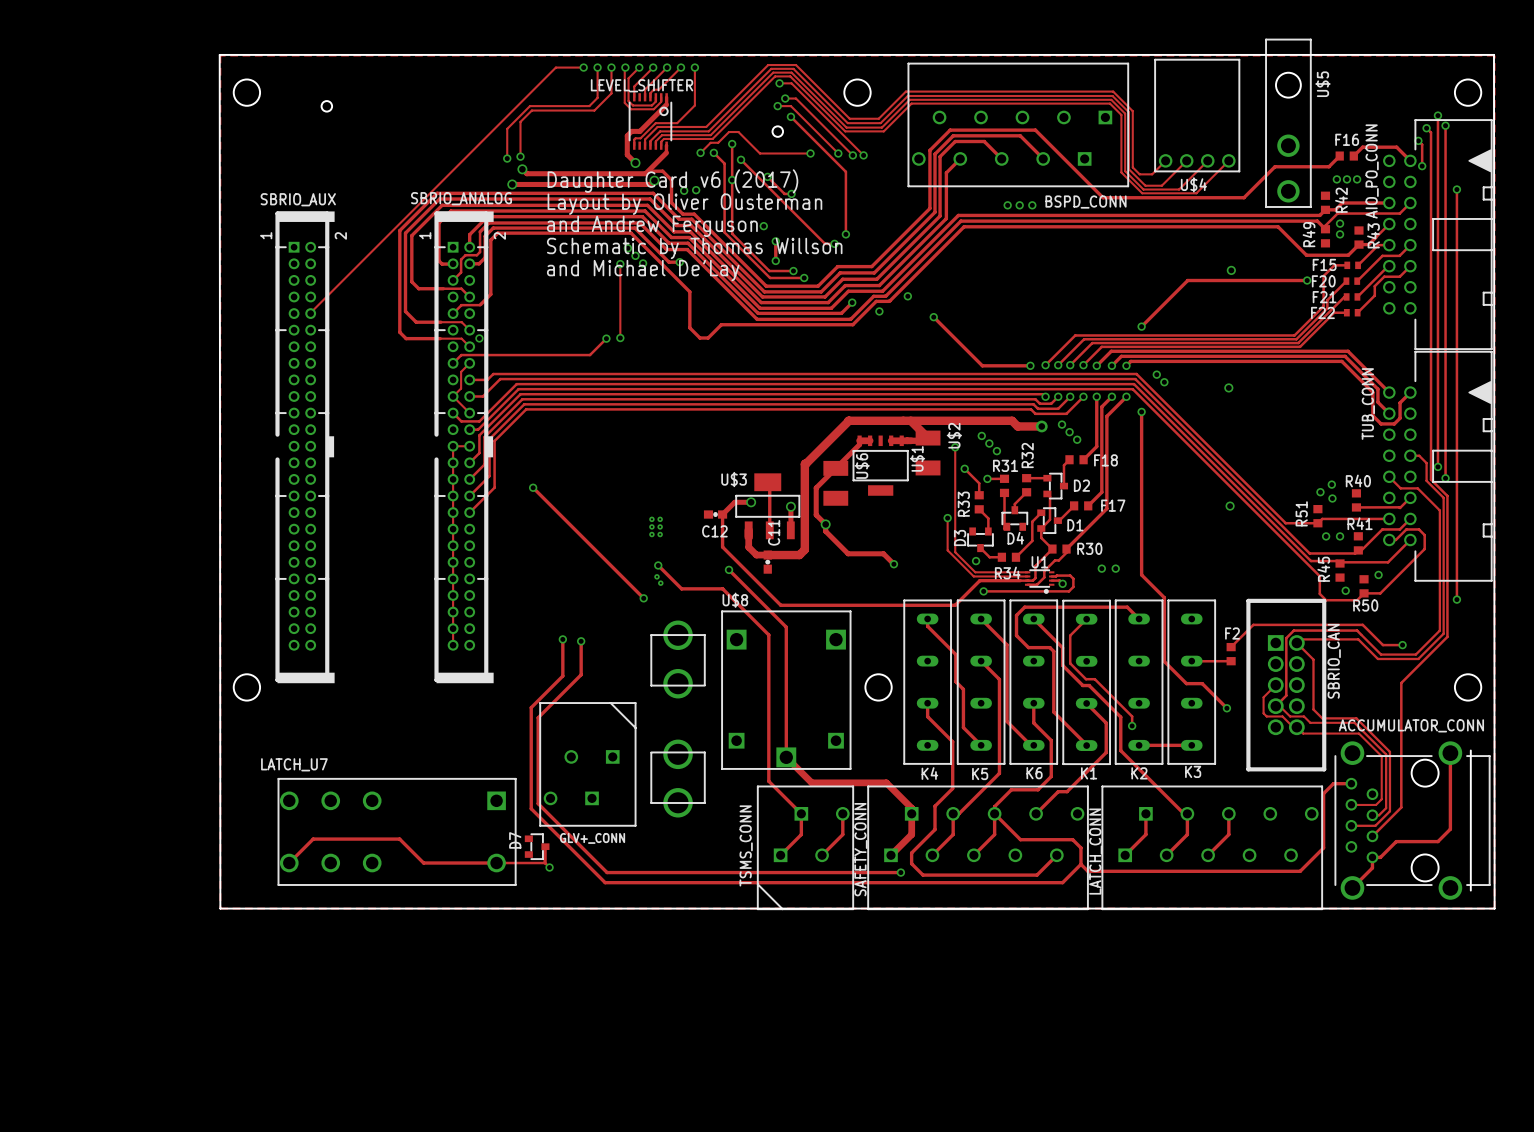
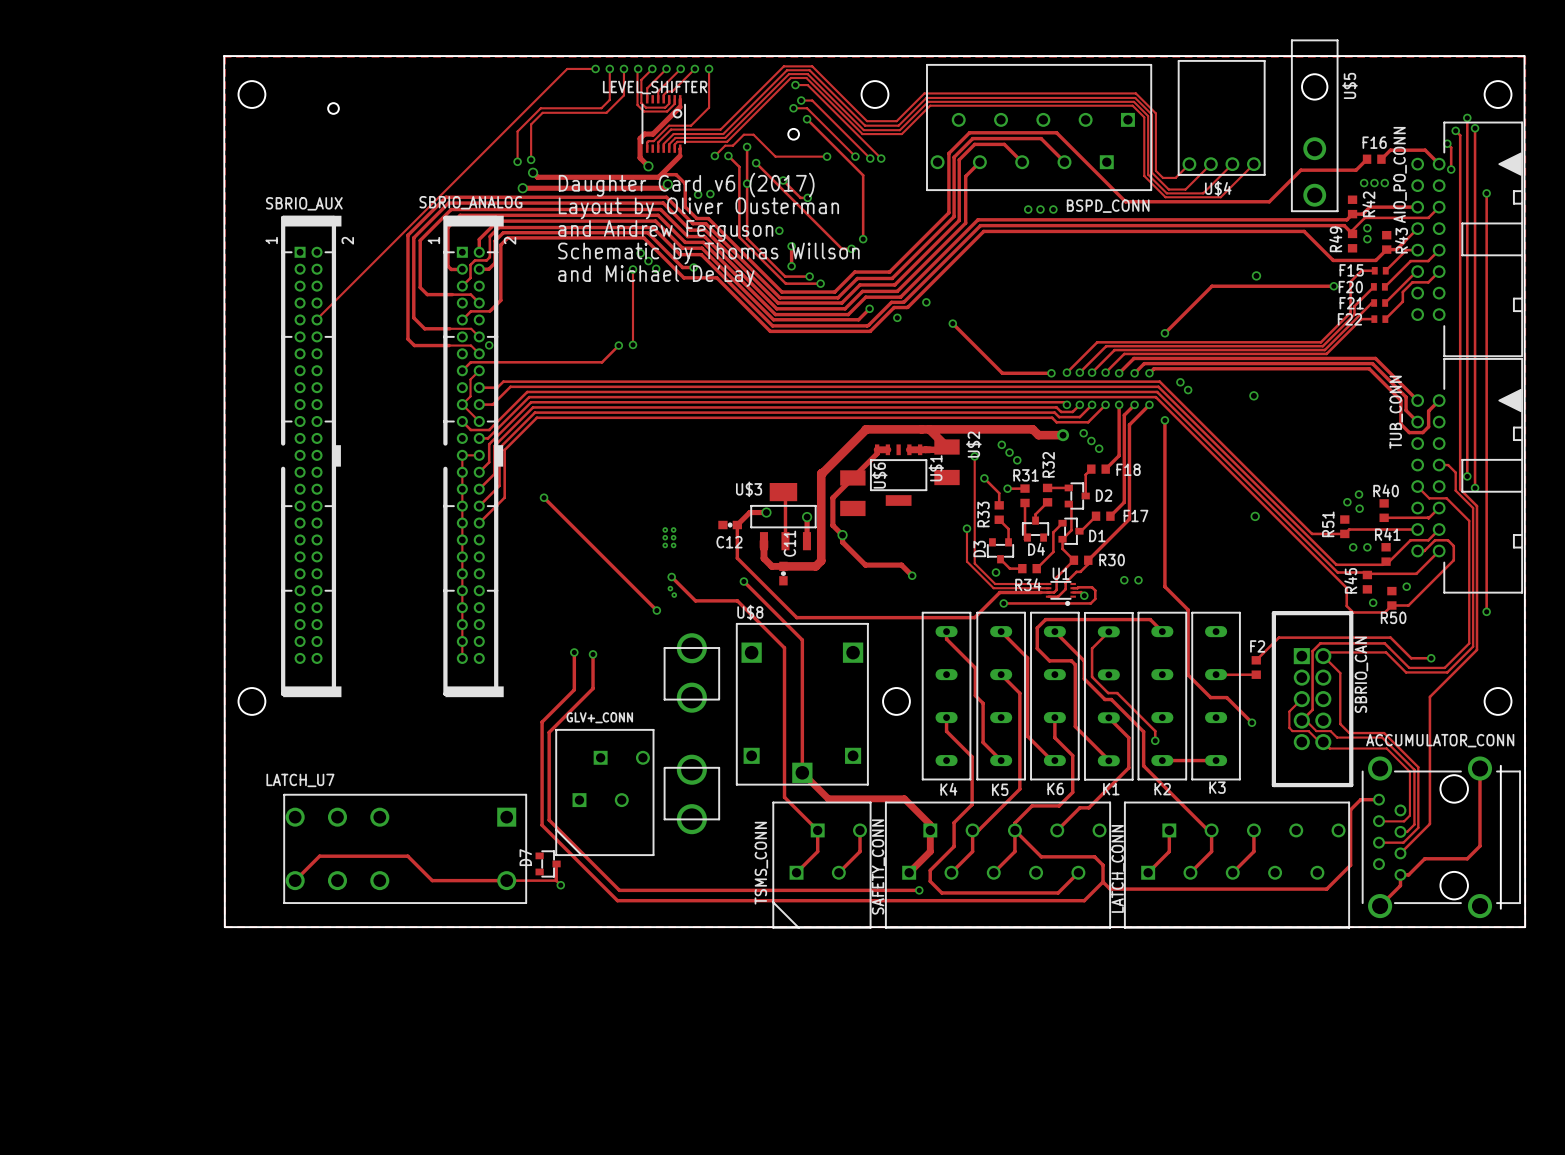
track: (670, 272) (689, 291) (689, 327) (699, 338) (708, 338) (721, 324) (754, 324) -> (683, 277) (716, 277) (770, 331)
GLV+_CONN rotation: 0° (587, 764) -> 180° (604, 792)

